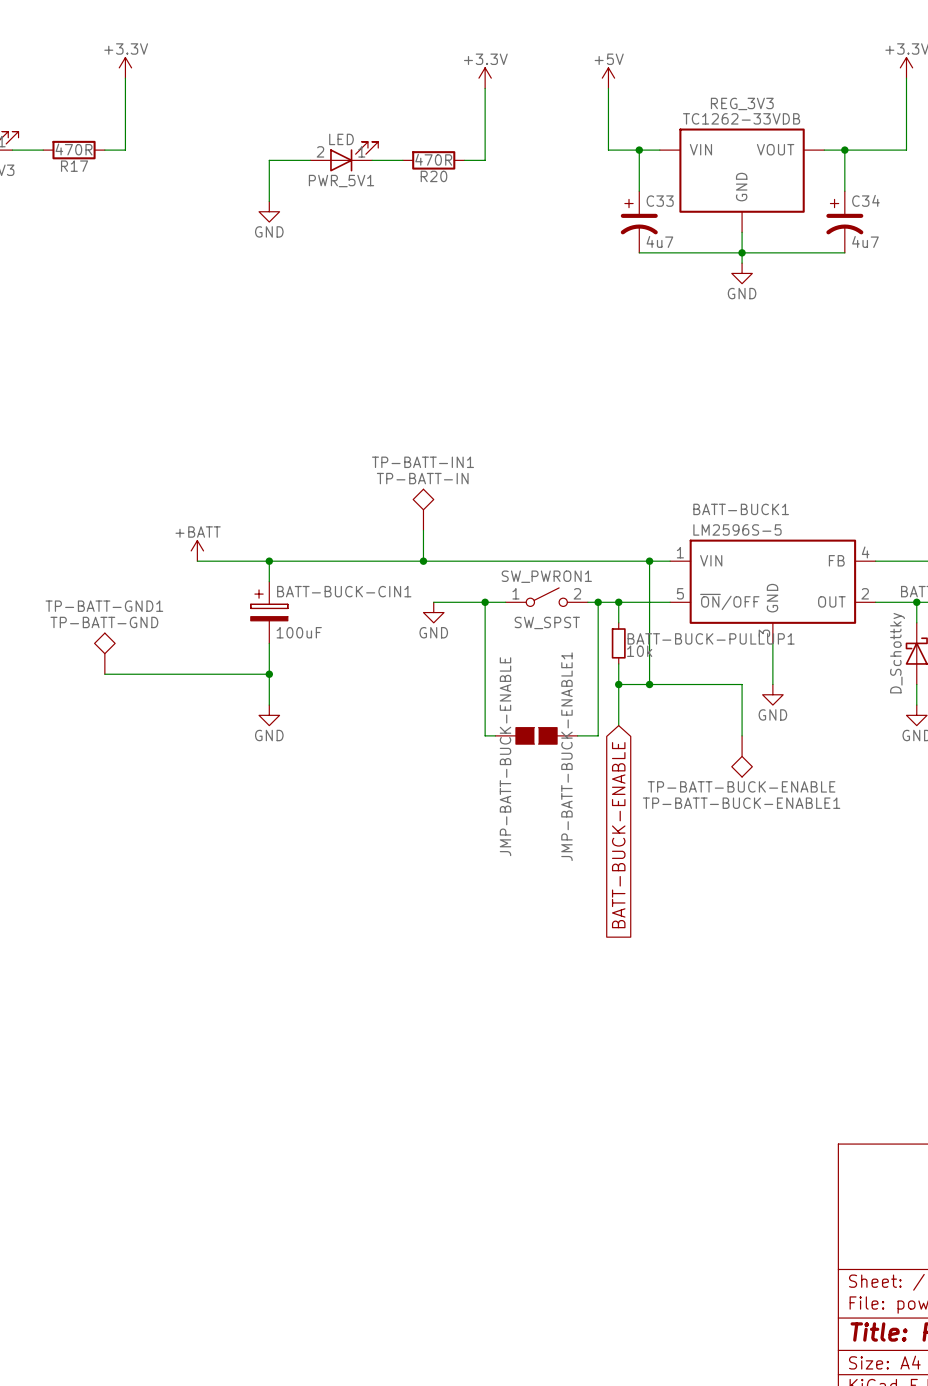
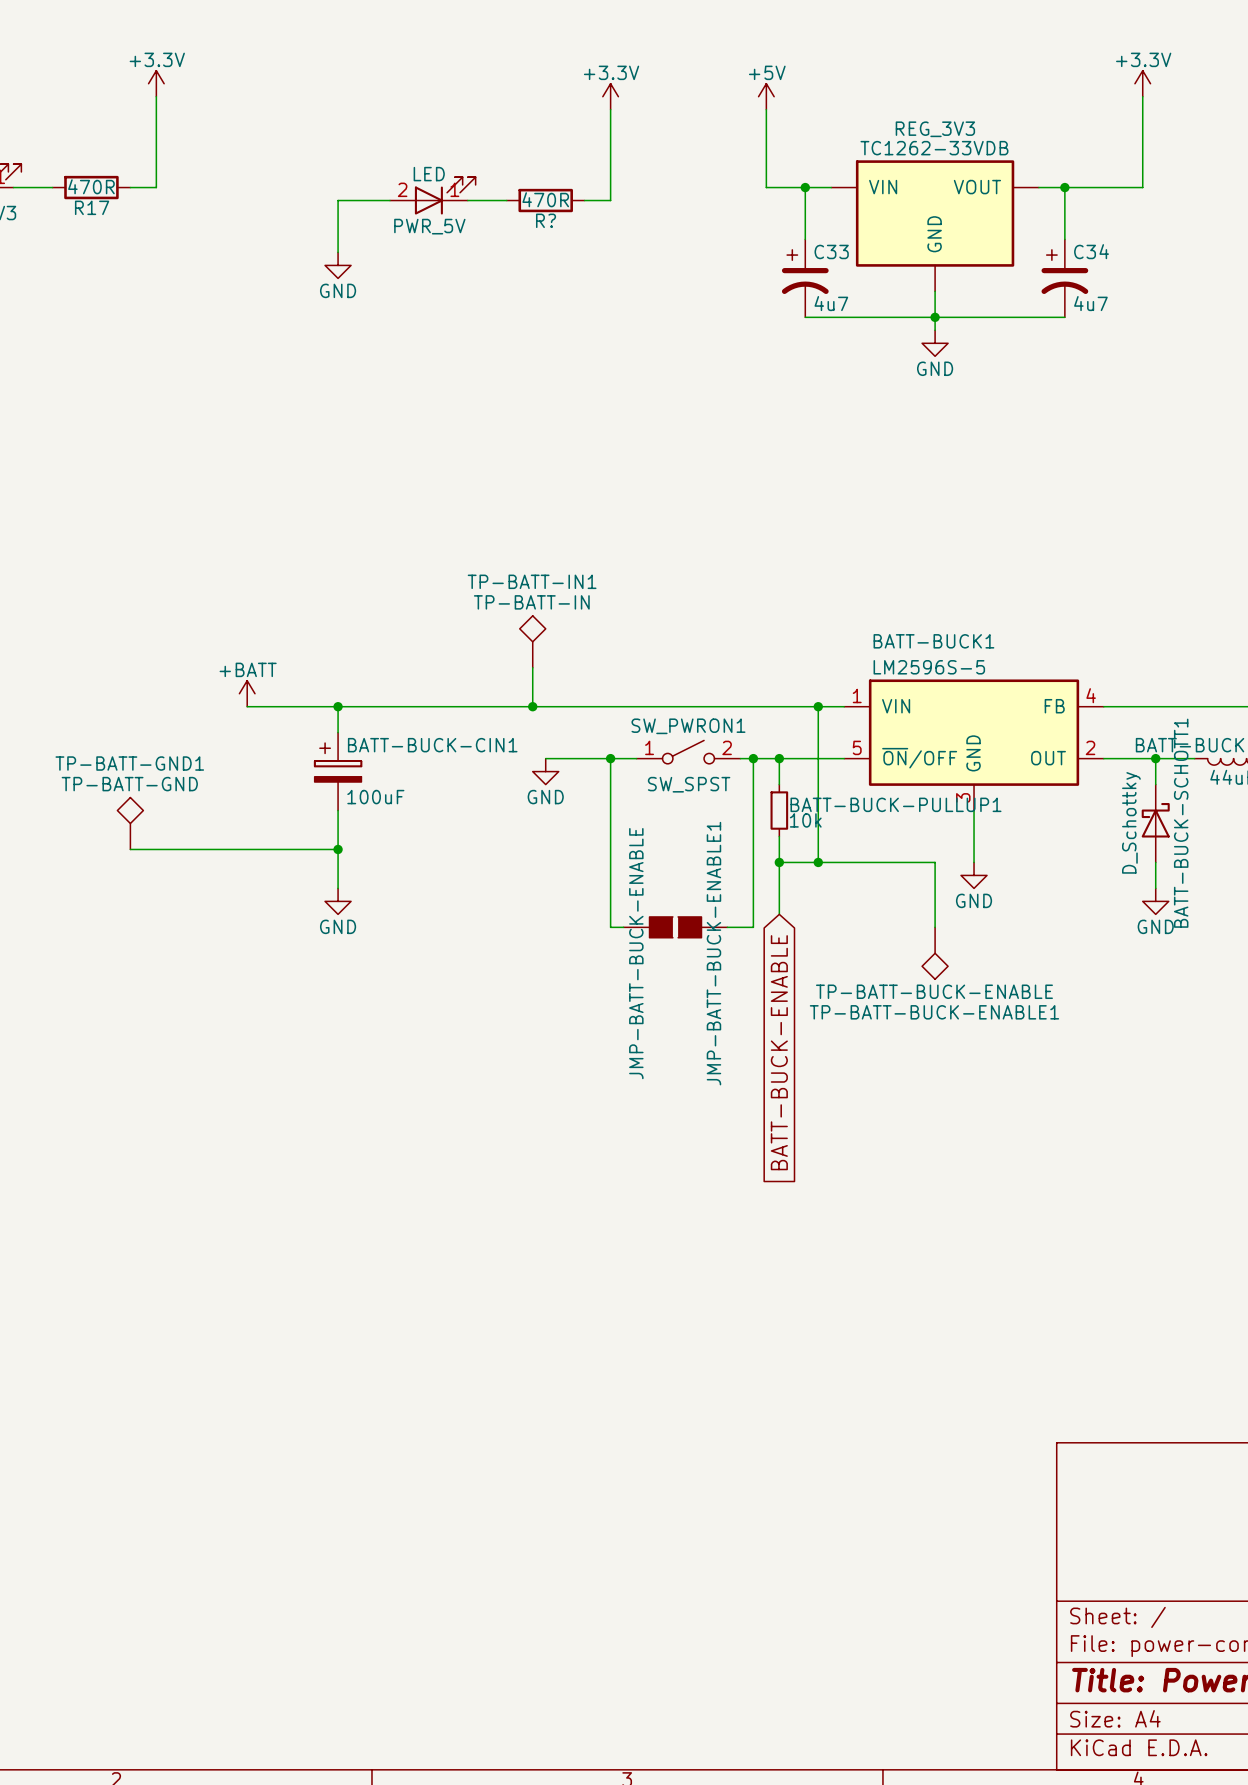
R20 name: R20 (433, 176) -> R? (546, 220)
PWR_5V1 name: PWR_5V1 (341, 181) -> PWR_5V (429, 226)

